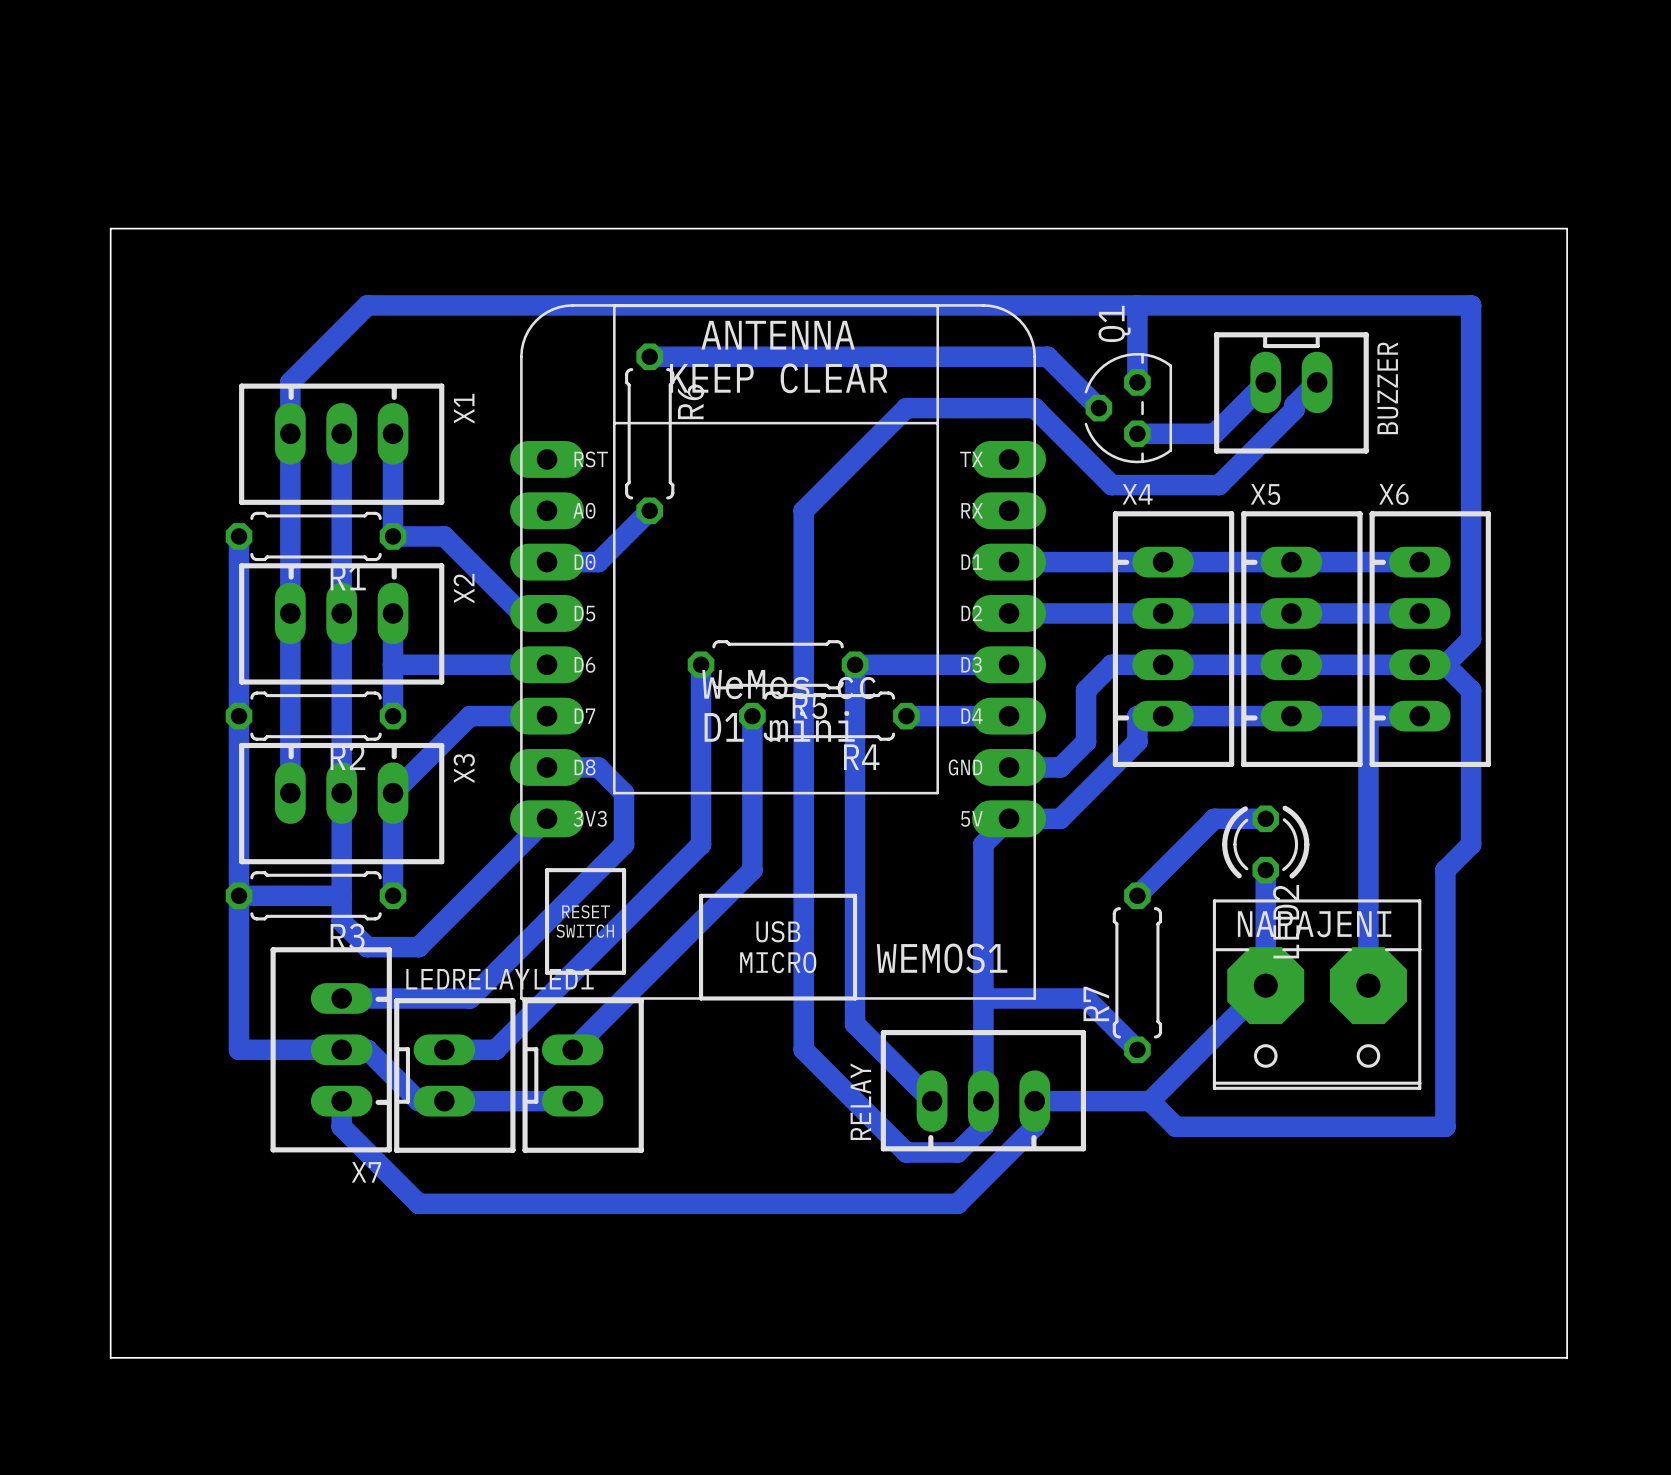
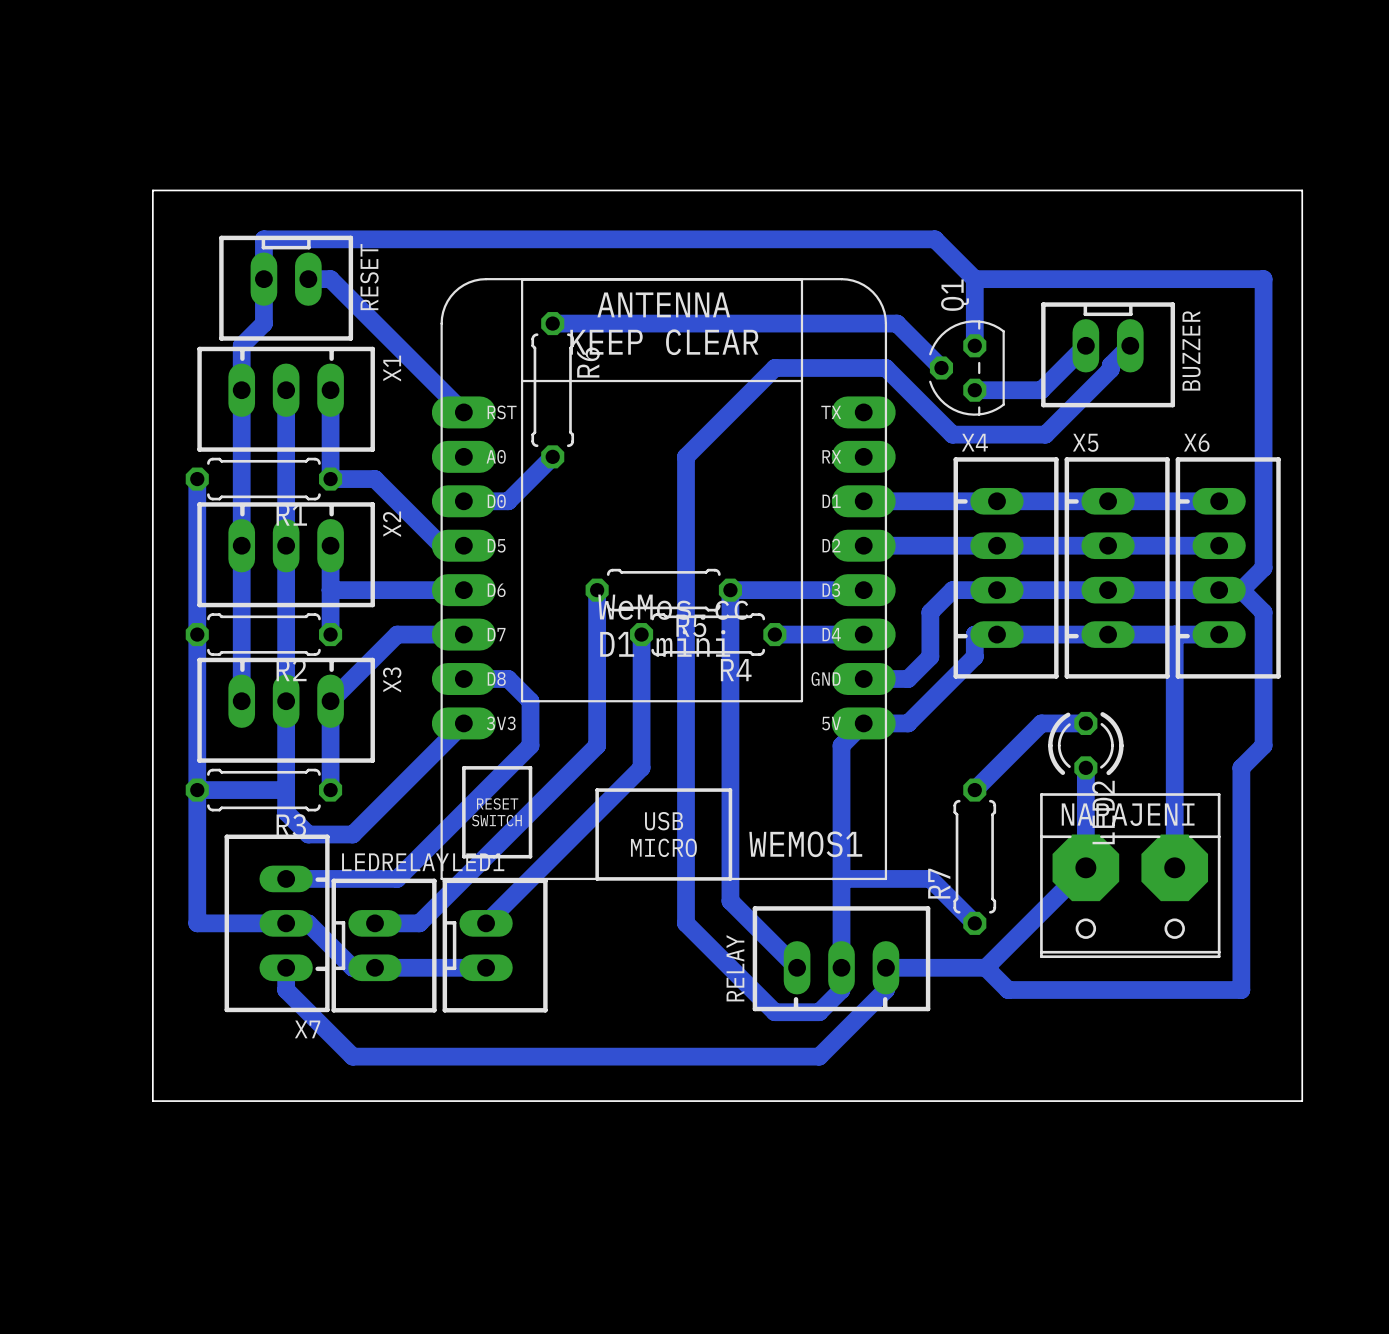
board edge: (110, 228) (1567, 228) (1567, 1357) (110, 1357) (110, 228) -> (152, 190) (152, 1101) (1302, 1101) (1302, 190) (152, 190)
bottom track: (367, 305) (316, 356) -> none
bottom track: (393, 305) (1137, 305) -> (263, 323) (263, 239) (934, 239) (974, 279)
bottom track: none -> (330, 279) (463, 412)
RESET: none -> (286, 288)

